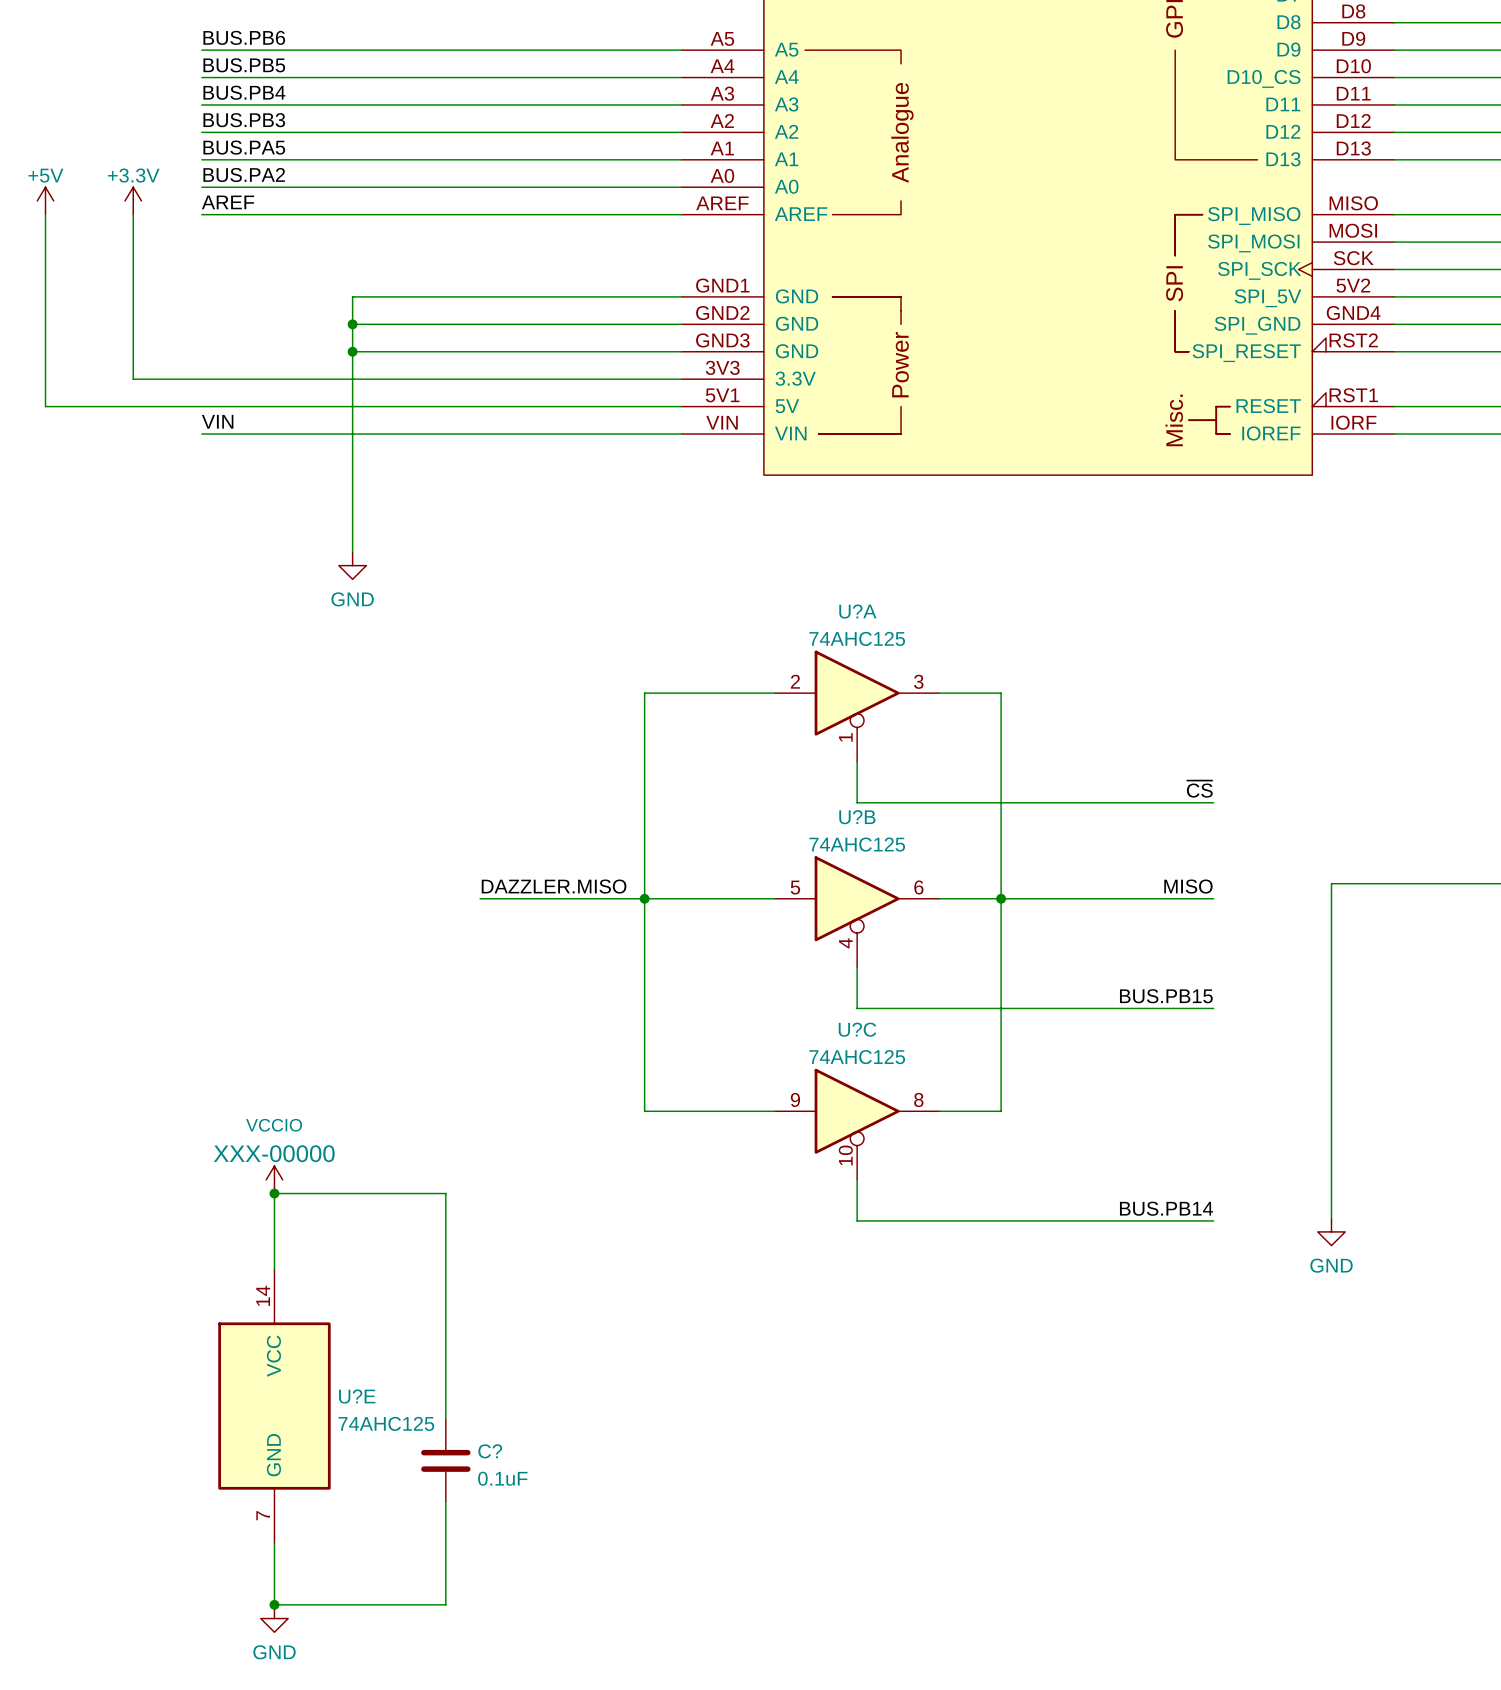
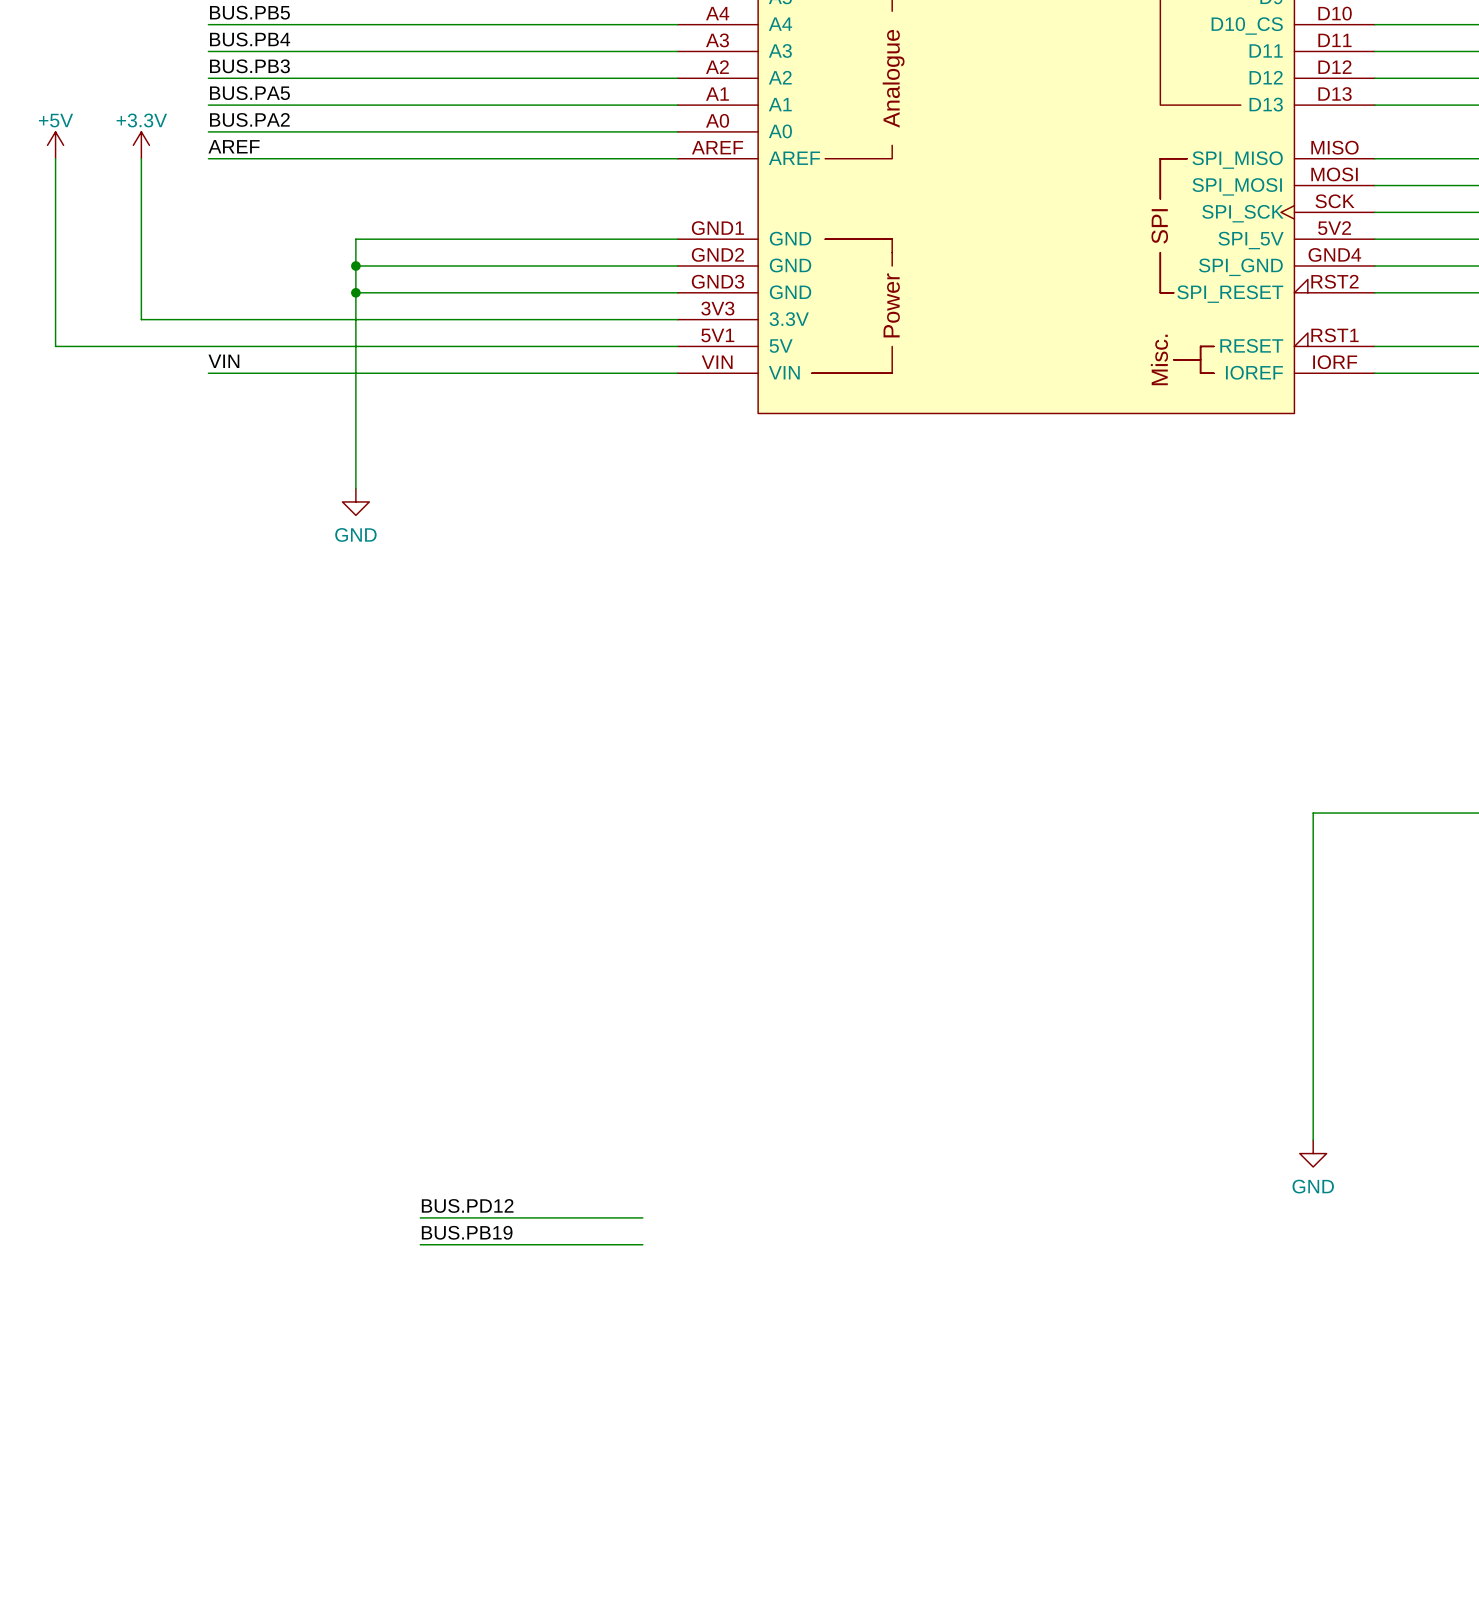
wire: (774, 693) (644, 693) (644, 1111) (774, 1111) -> none
wire: (939, 693) (1001, 693) (1001, 1111) (939, 1111) -> none
U?A: 74AHC125 (857, 706) -> none
wire: (857, 761) (857, 802) (1213, 802) -> none
label: ~{CS} (1199, 789) -> none
label: DAZZLER.MISO (554, 886) -> none
label: MISO (1188, 886) -> none
wire: (480, 898) (774, 898) -> none
junction: (644, 898) -> none
wire: (939, 898) (1213, 898) -> none
junction: (1001, 898) -> none
U?B: 74AHC125 (857, 911) -> none
wire: (857, 967) (857, 1008) (1213, 1008) -> none
label: BUS.PB15 (1166, 996) -> none
U?C: 74AHC125 (857, 1124) -> none
power symbol: VCCIO (274, 1179) -> none
wire: (857, 1179) (857, 1220) (1213, 1220) -> none
junction: (274, 1193) -> none
label: BUS.PB14 (1166, 1208) -> none
wire: (274, 1268) (274, 1193) (445, 1193) (445, 1419) -> none
label: none -> BUS.PD12 (467, 1205)
wire: none -> (420, 1217) (642, 1217)
label: none -> BUS.PB19 (467, 1232)
wire: none -> (420, 1244) (642, 1244)
U?E: 74AHC125 (274, 1406) -> none
C?: 0.1uF (445, 1460) -> none
wire: (445, 1502) (445, 1604) (274, 1604) (274, 1543) -> none
junction: (274, 1604) -> none
power symbol: GND (274, 1618) -> none

